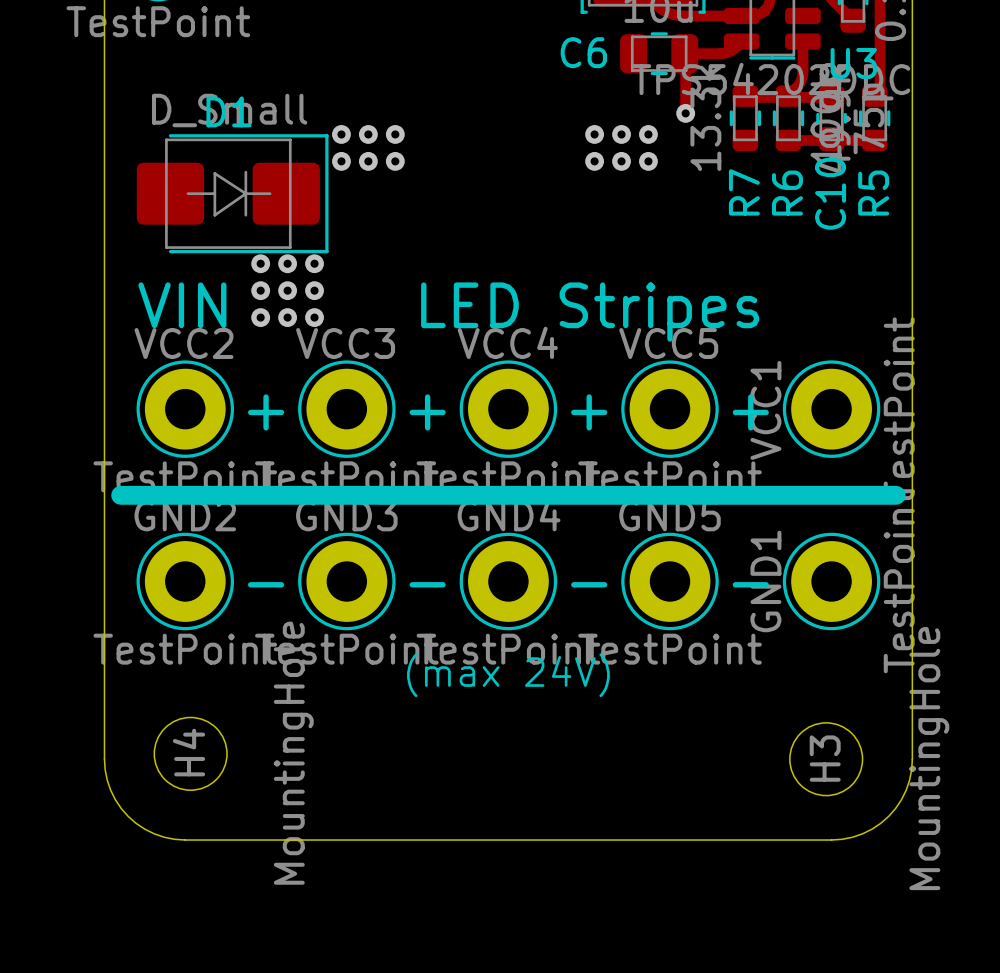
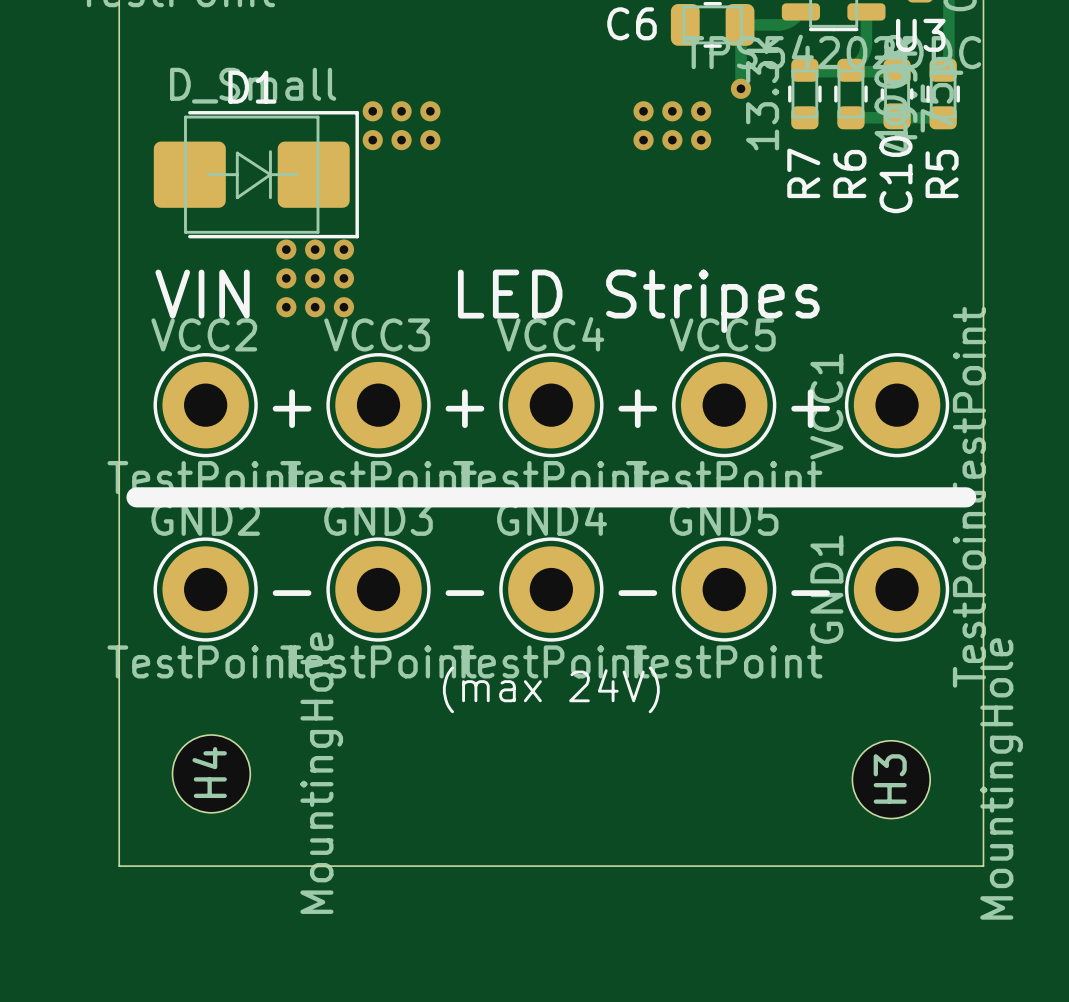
board edge: (104, 759) (110, 790) (128, 816) (154, 833) (185, 840) -> (119, 779) (119, 866) (205, 866)
board edge: (912, 759) (906, 790) (888, 816) (862, 833) (831, 840) -> (983, 779) (983, 866) (897, 866)

